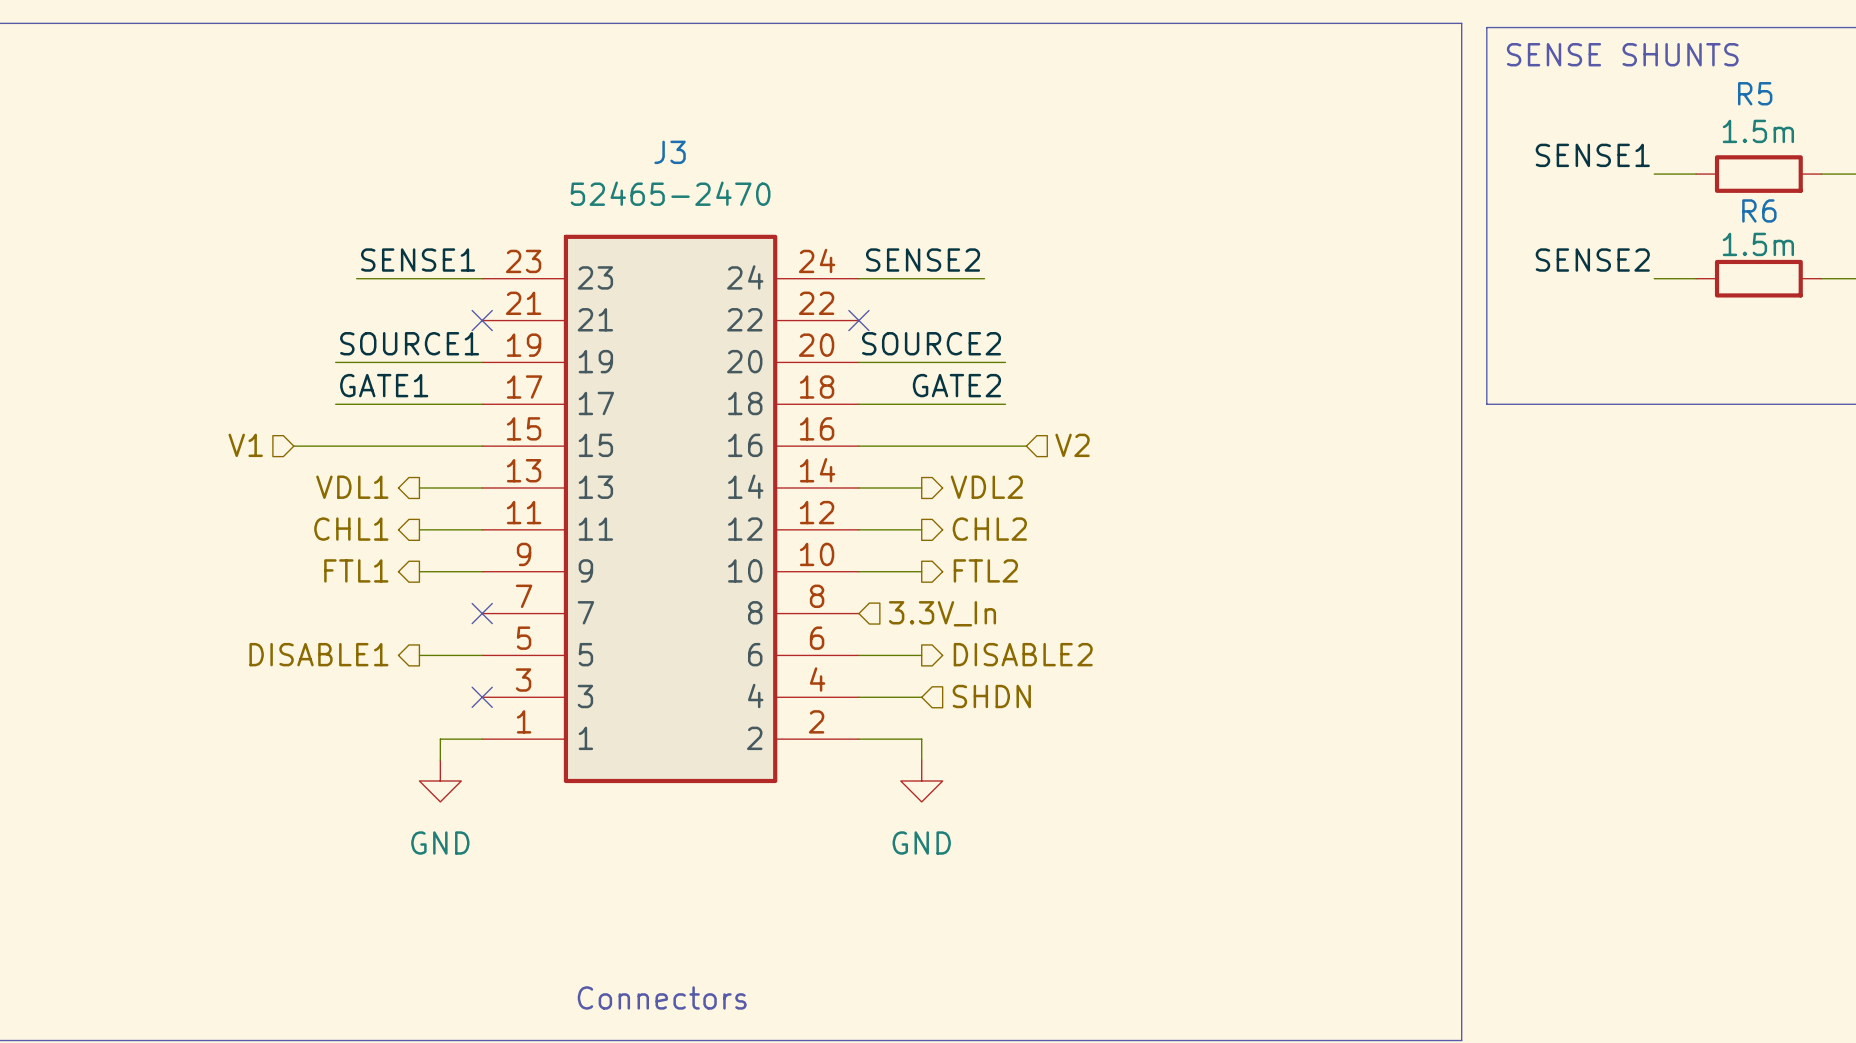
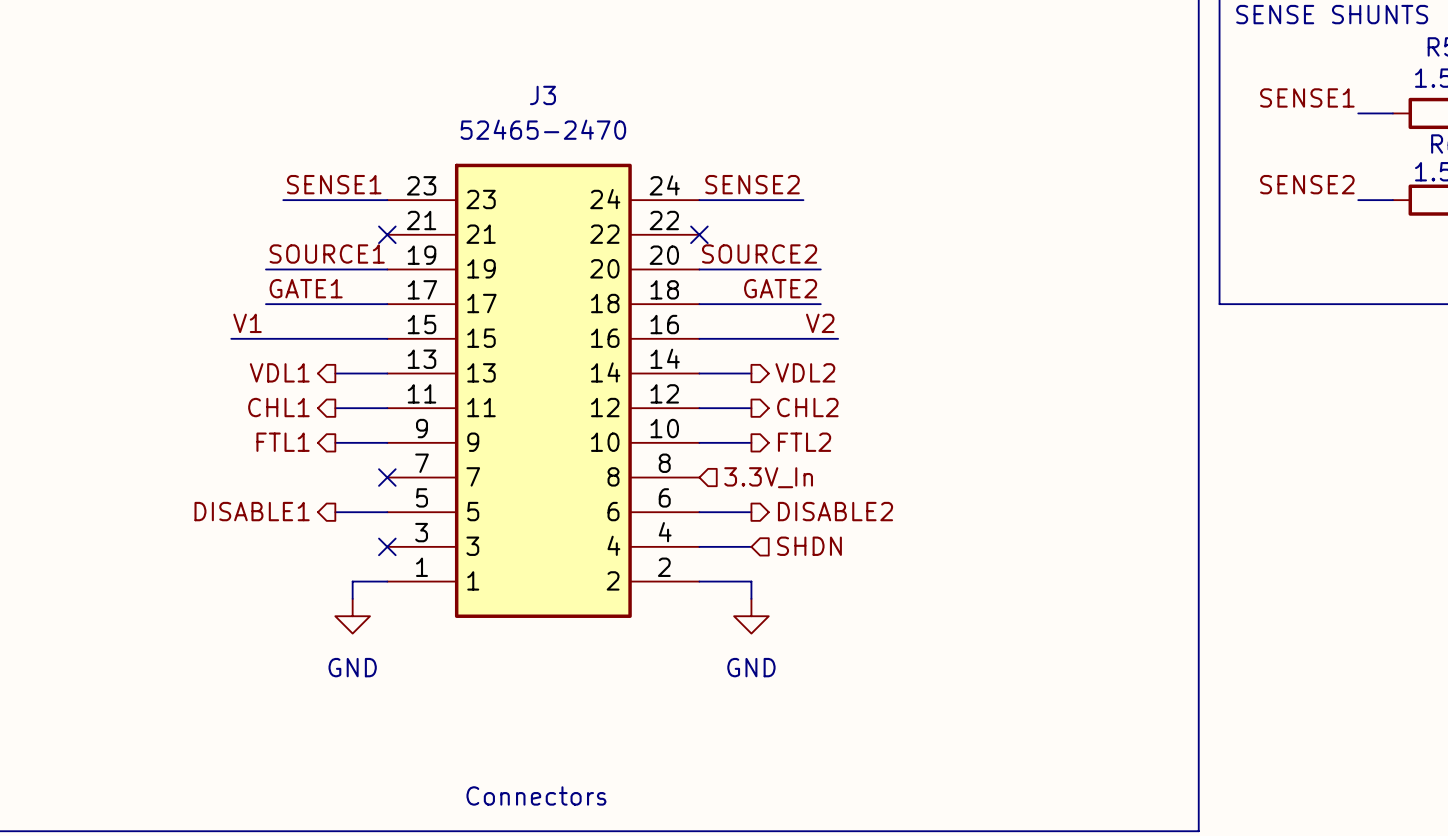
label: none -> V1 (247, 323)
label: none -> V2 (820, 323)
hierarchical label: V1 (245, 445) -> none
hierarchical label: V2 (1072, 445) -> none

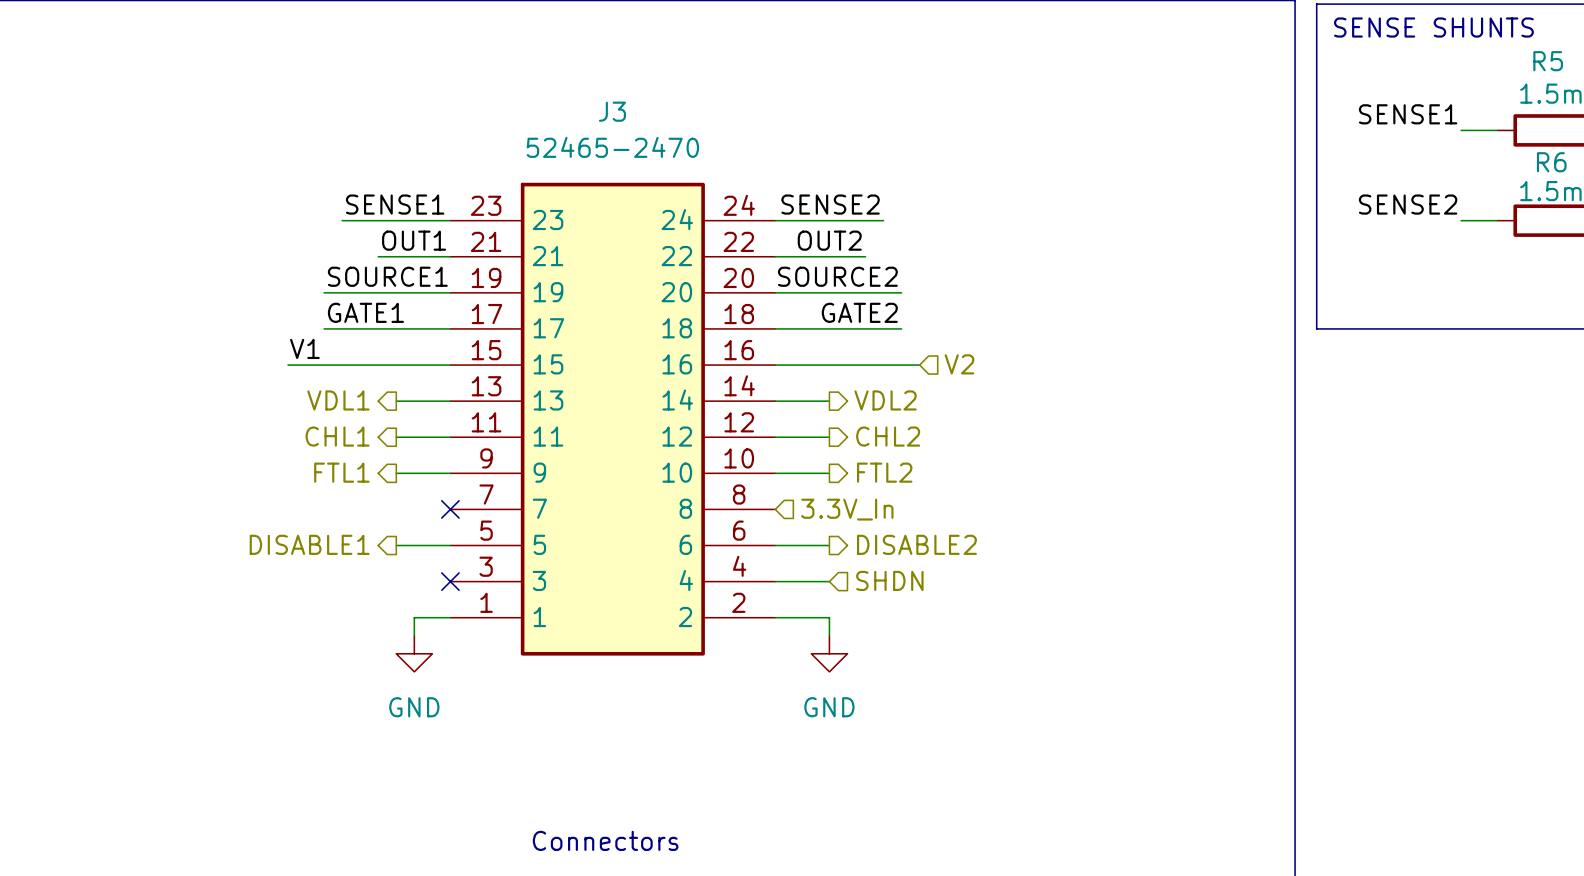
label: none -> OUT1 (414, 240)
label: none -> OUT2 (829, 240)
wire: none -> (378, 256) (450, 256)
no-connect mark: (387, 234) -> none
wire: none -> (775, 256) (865, 256)
no-connect mark: (699, 234) -> none
label: V2 (820, 323) -> none
hierarchical label: none -> V2 (959, 364)

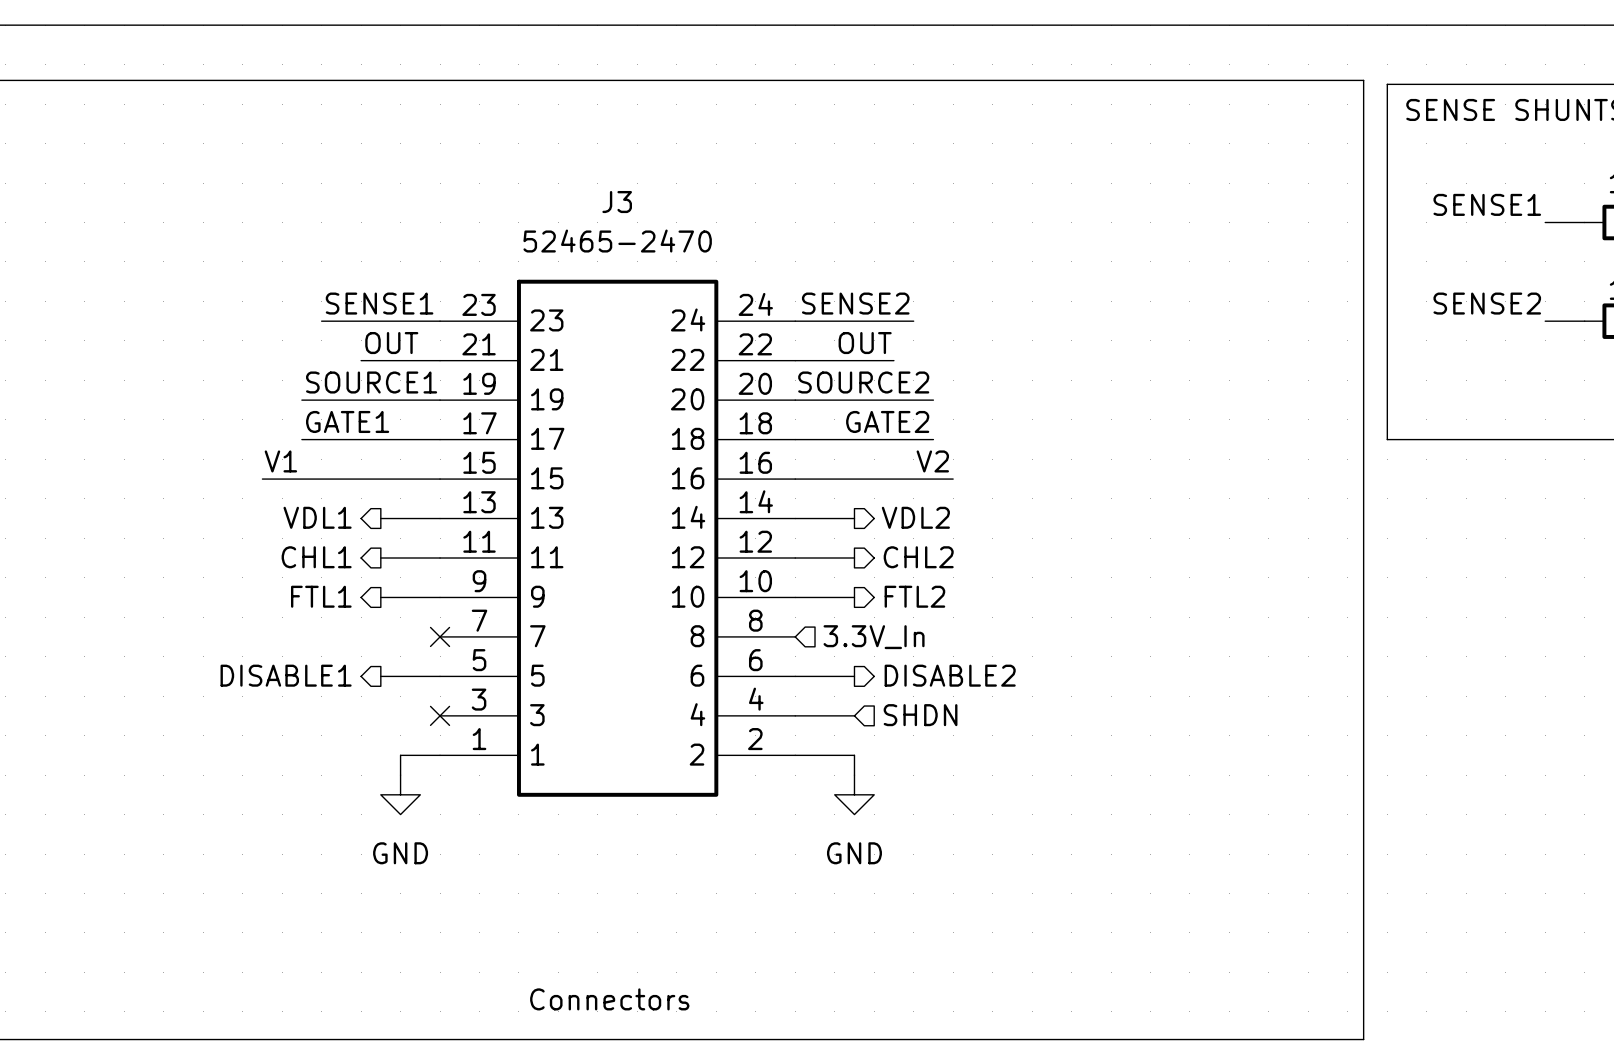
label: OUT1 (414, 240) -> OUT (391, 343)
label: OUT2 (829, 240) -> OUT (865, 343)
label: none -> V2 (932, 461)
hierarchical label: V2 (959, 364) -> none

